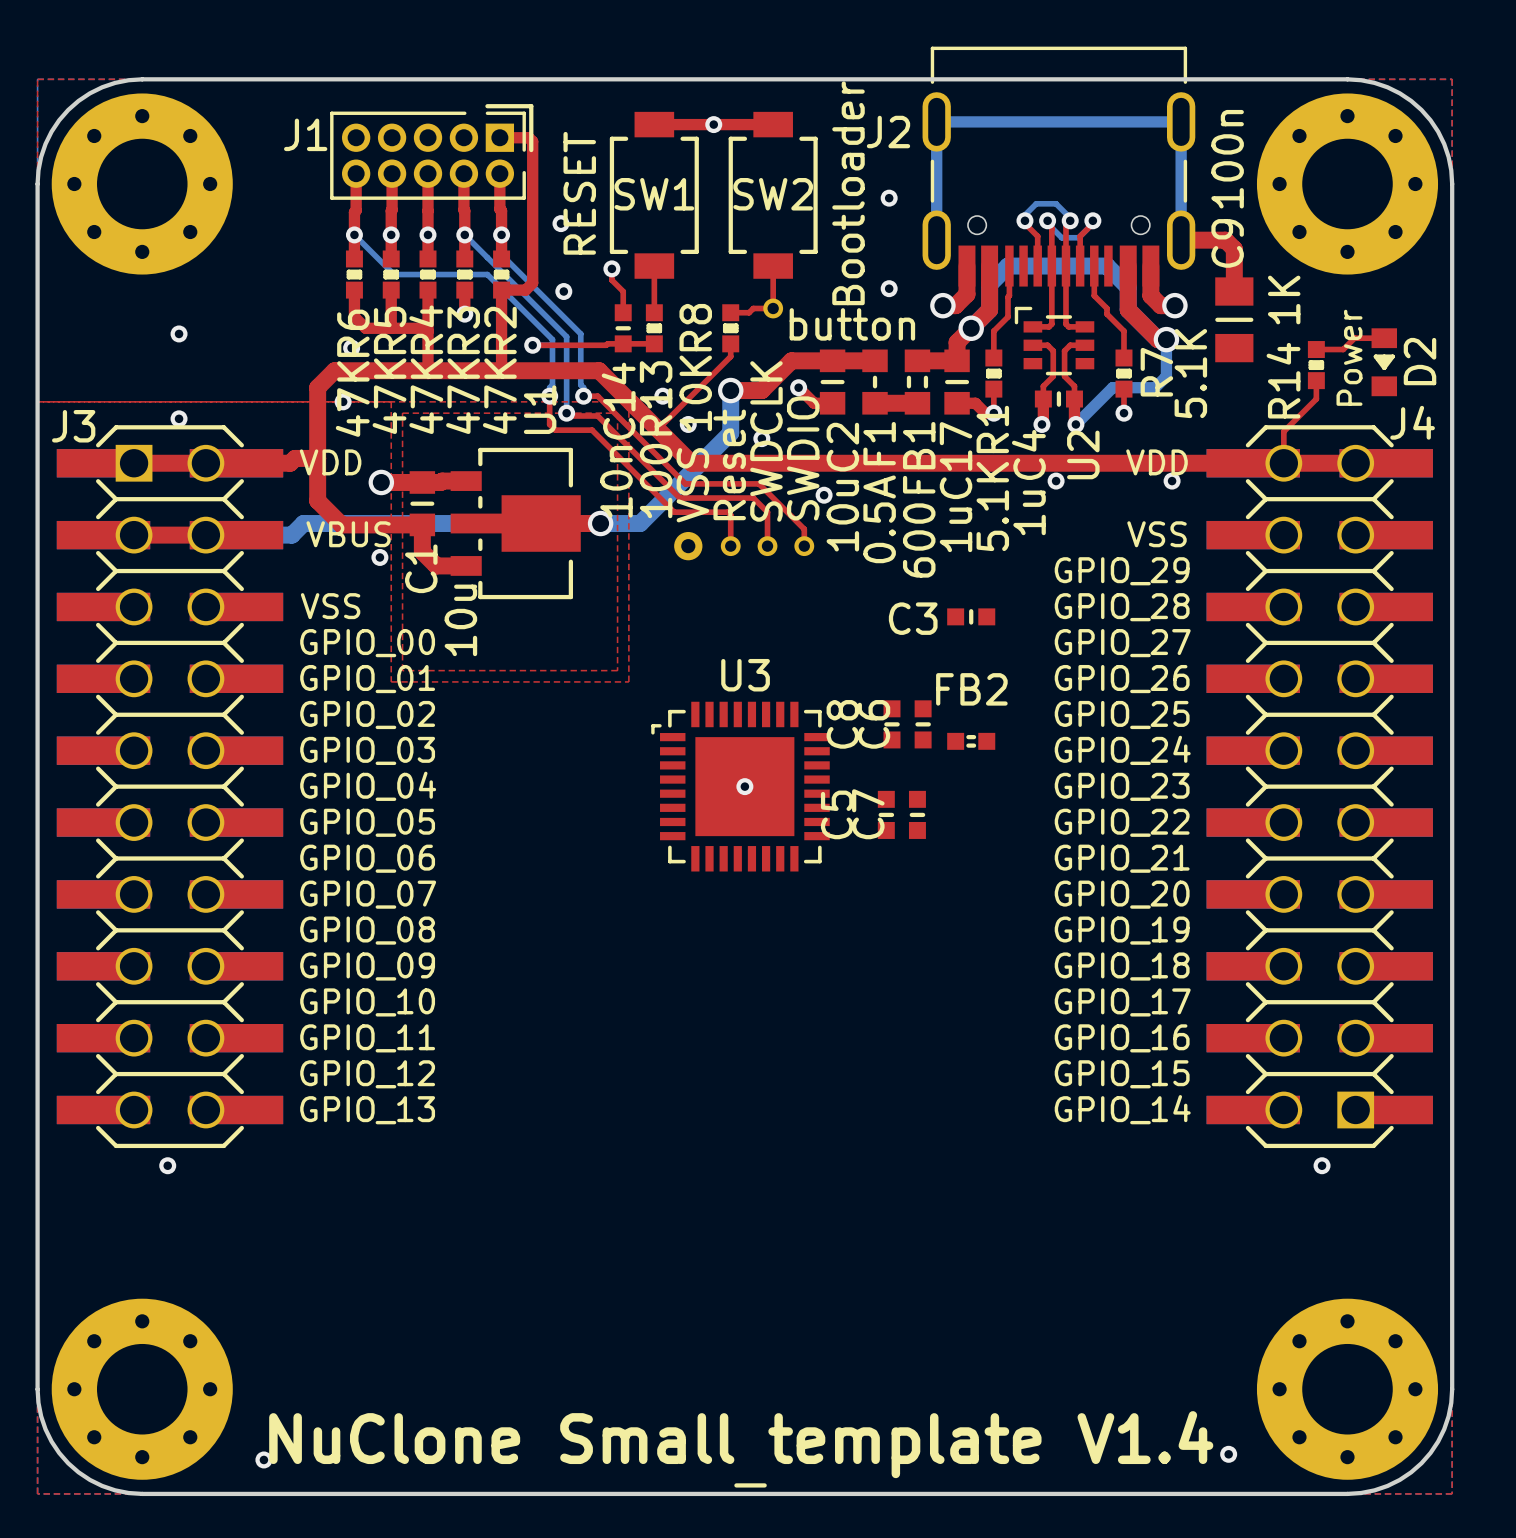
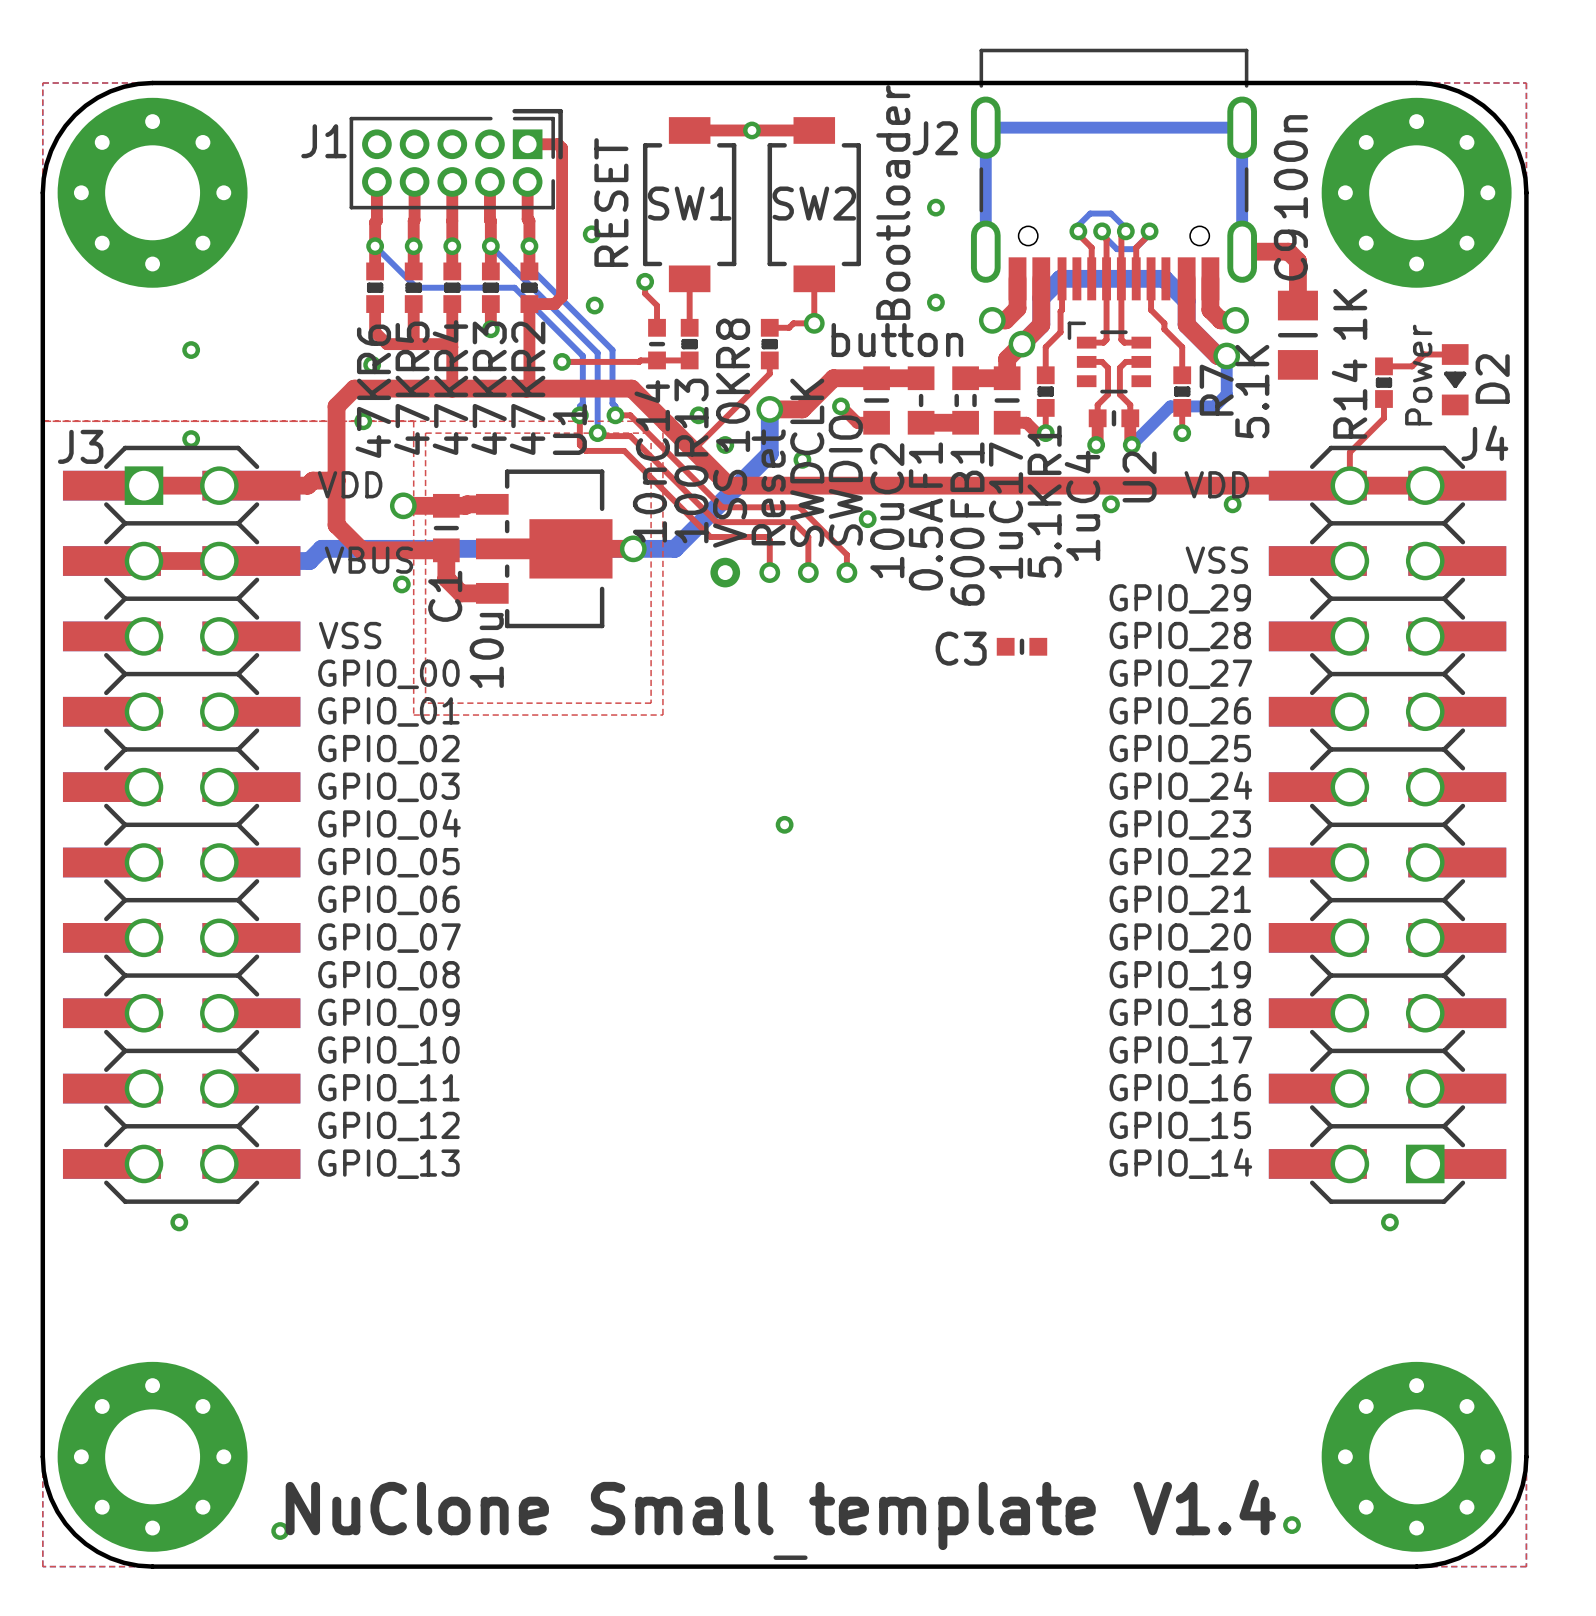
C8: (892, 724) -> none
C6: (923, 724) -> none
FB2: (971, 741) -> none
U3: (740, 786) -> none
C5: (886, 814) -> none
C7: (917, 814) -> none

